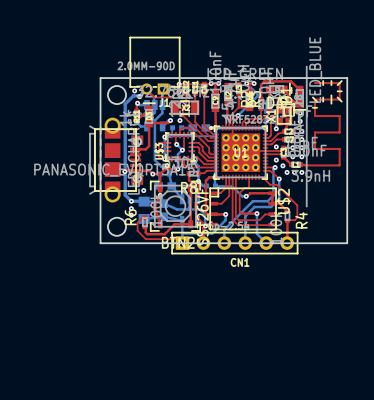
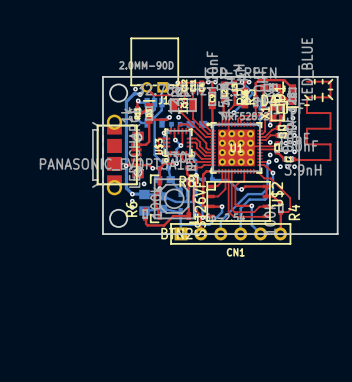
bottom track: (170, 136) (215, 136) -> none
top track: (144, 217) (137, 222) (137, 230) (145, 239) (178, 239) (182, 243) -> none

